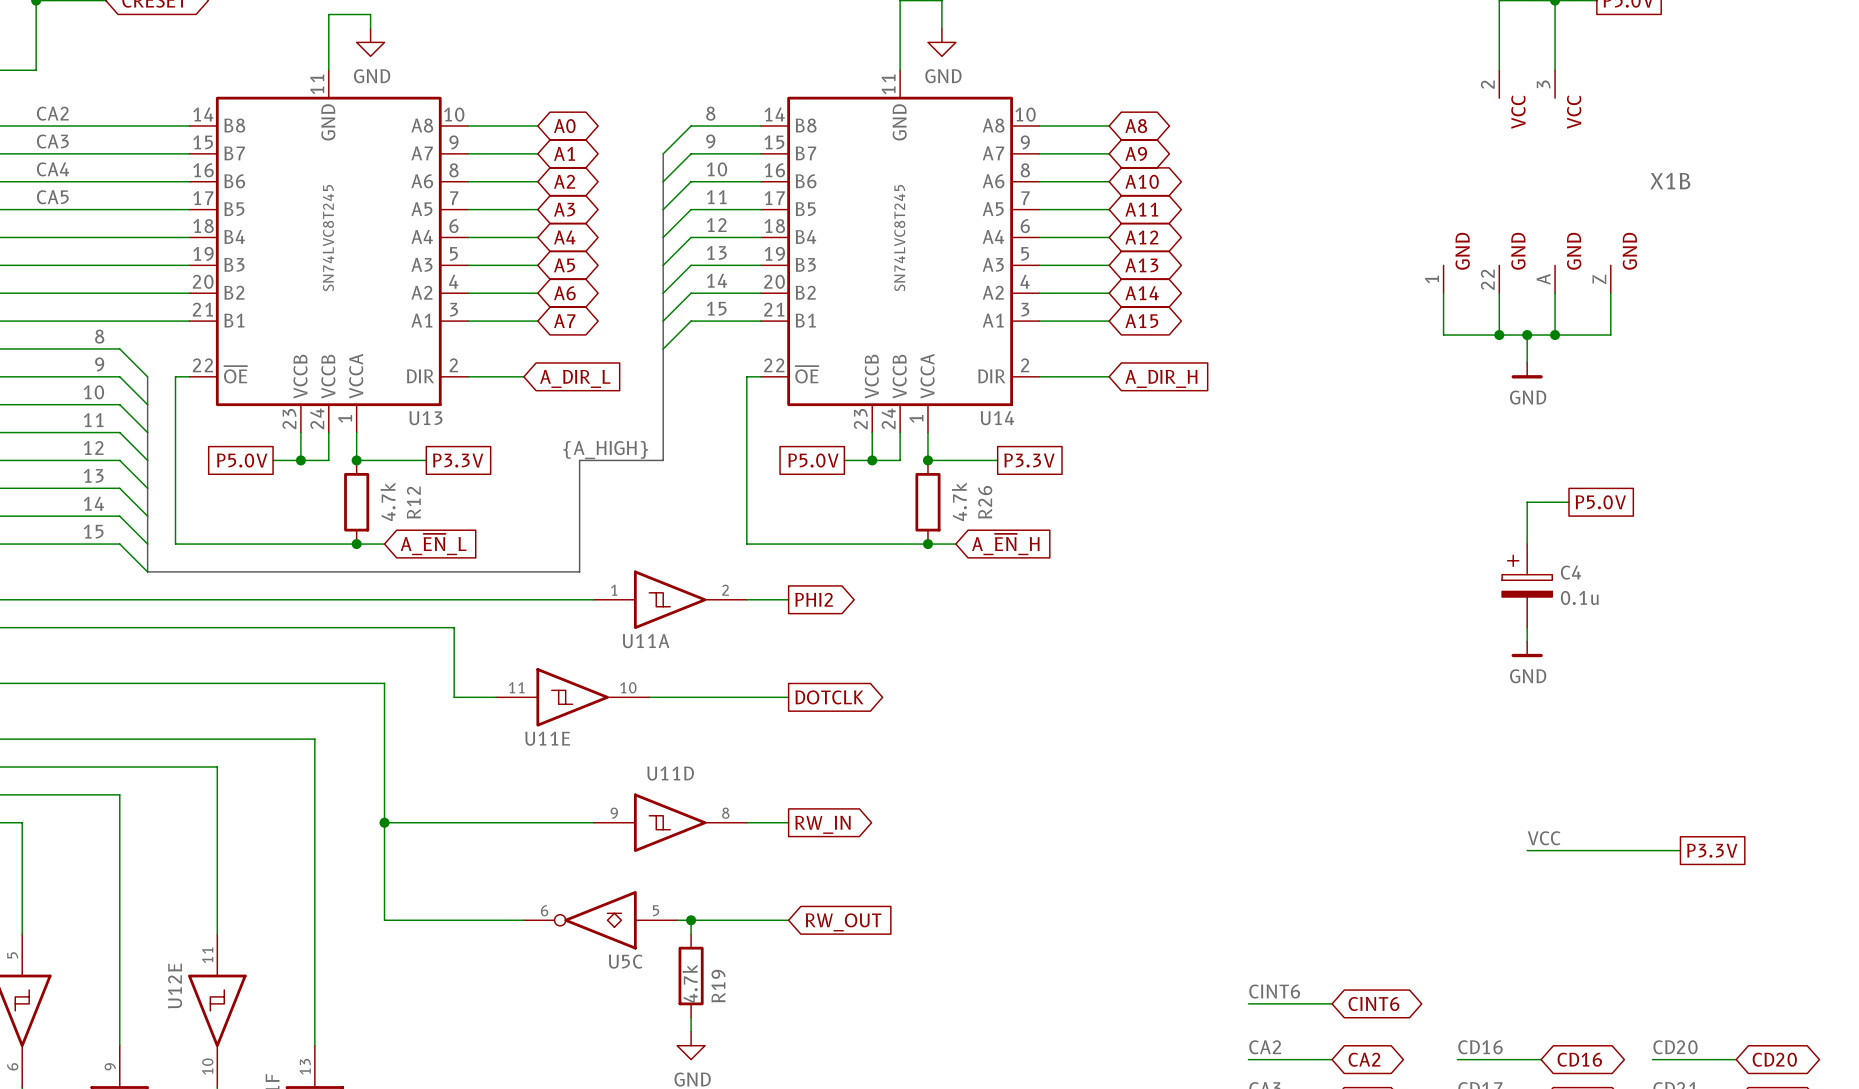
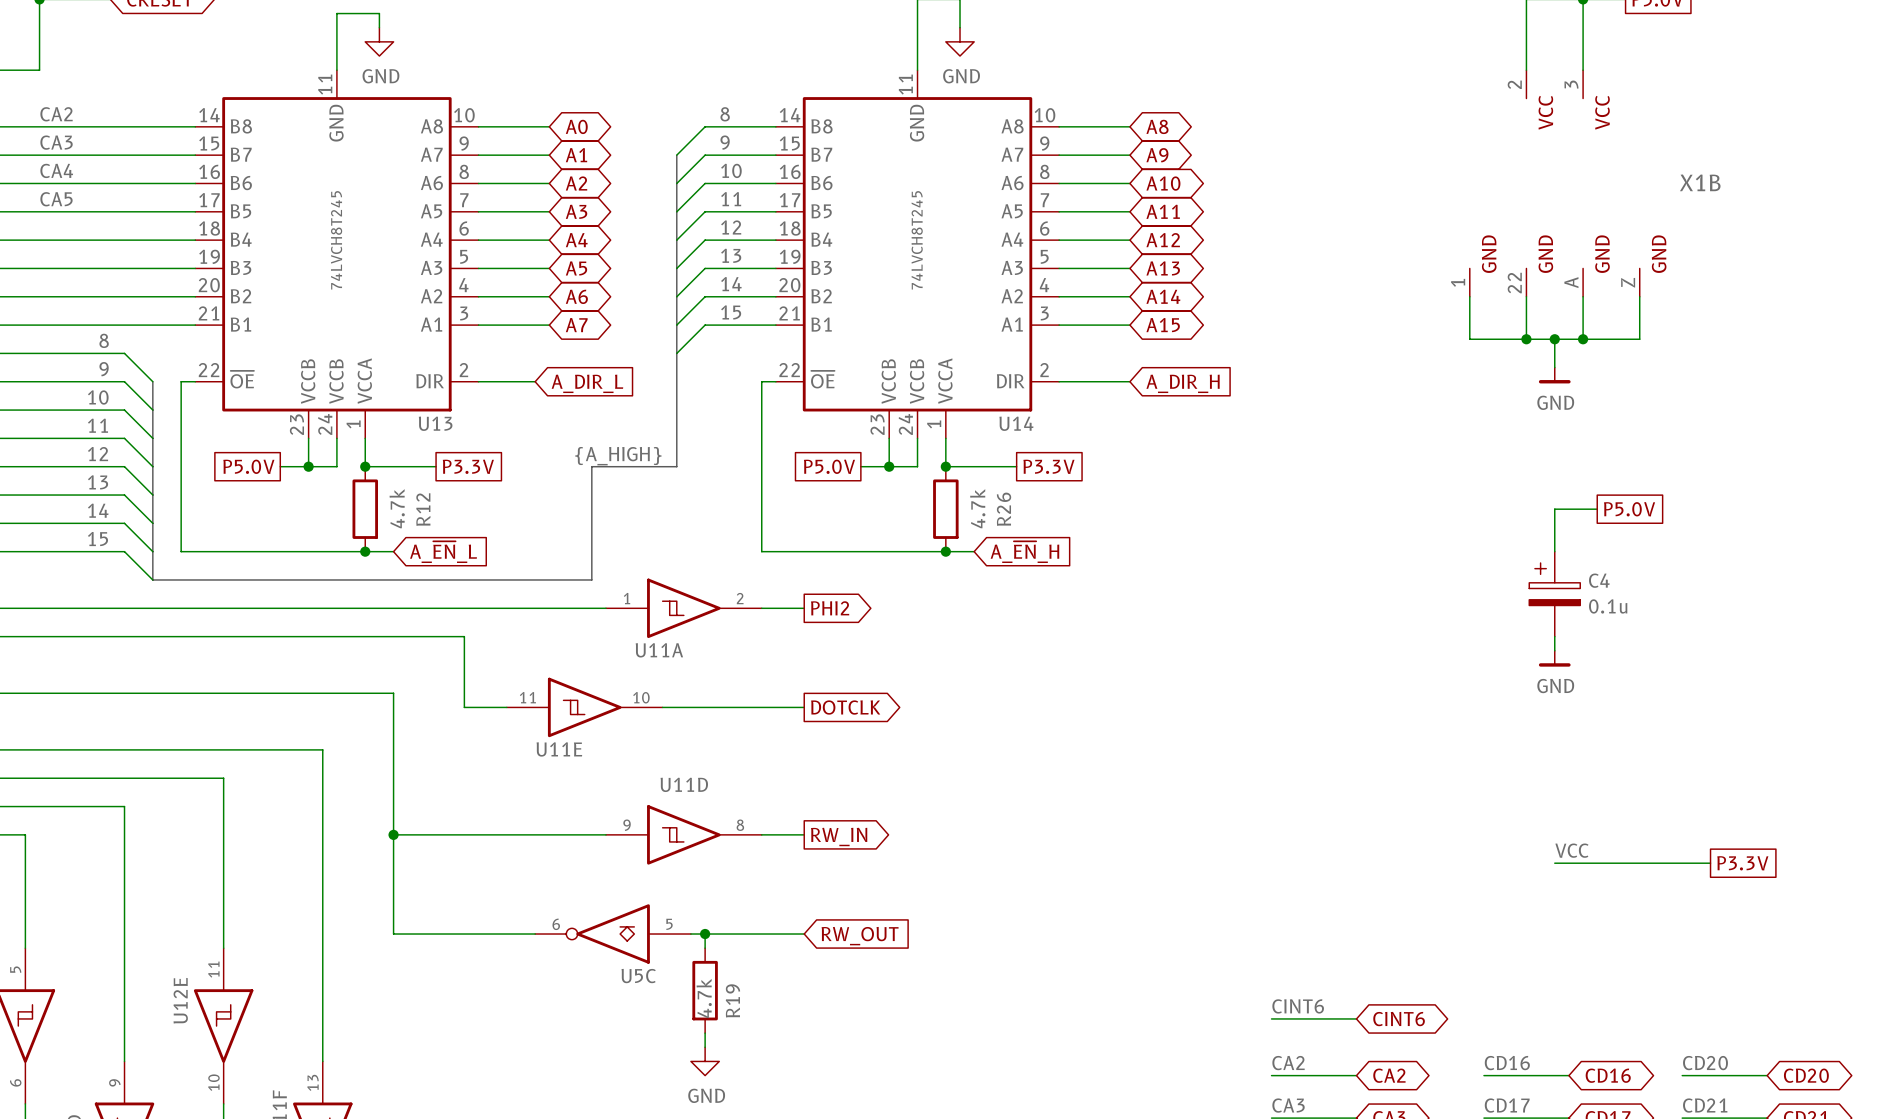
U13 value: SN74LVC8T245 (328, 238) -> 74LVCH8T245 (336, 240)
U14 value: SN74LVC8T245 (899, 238) -> 74LVCH8T245 (917, 240)

